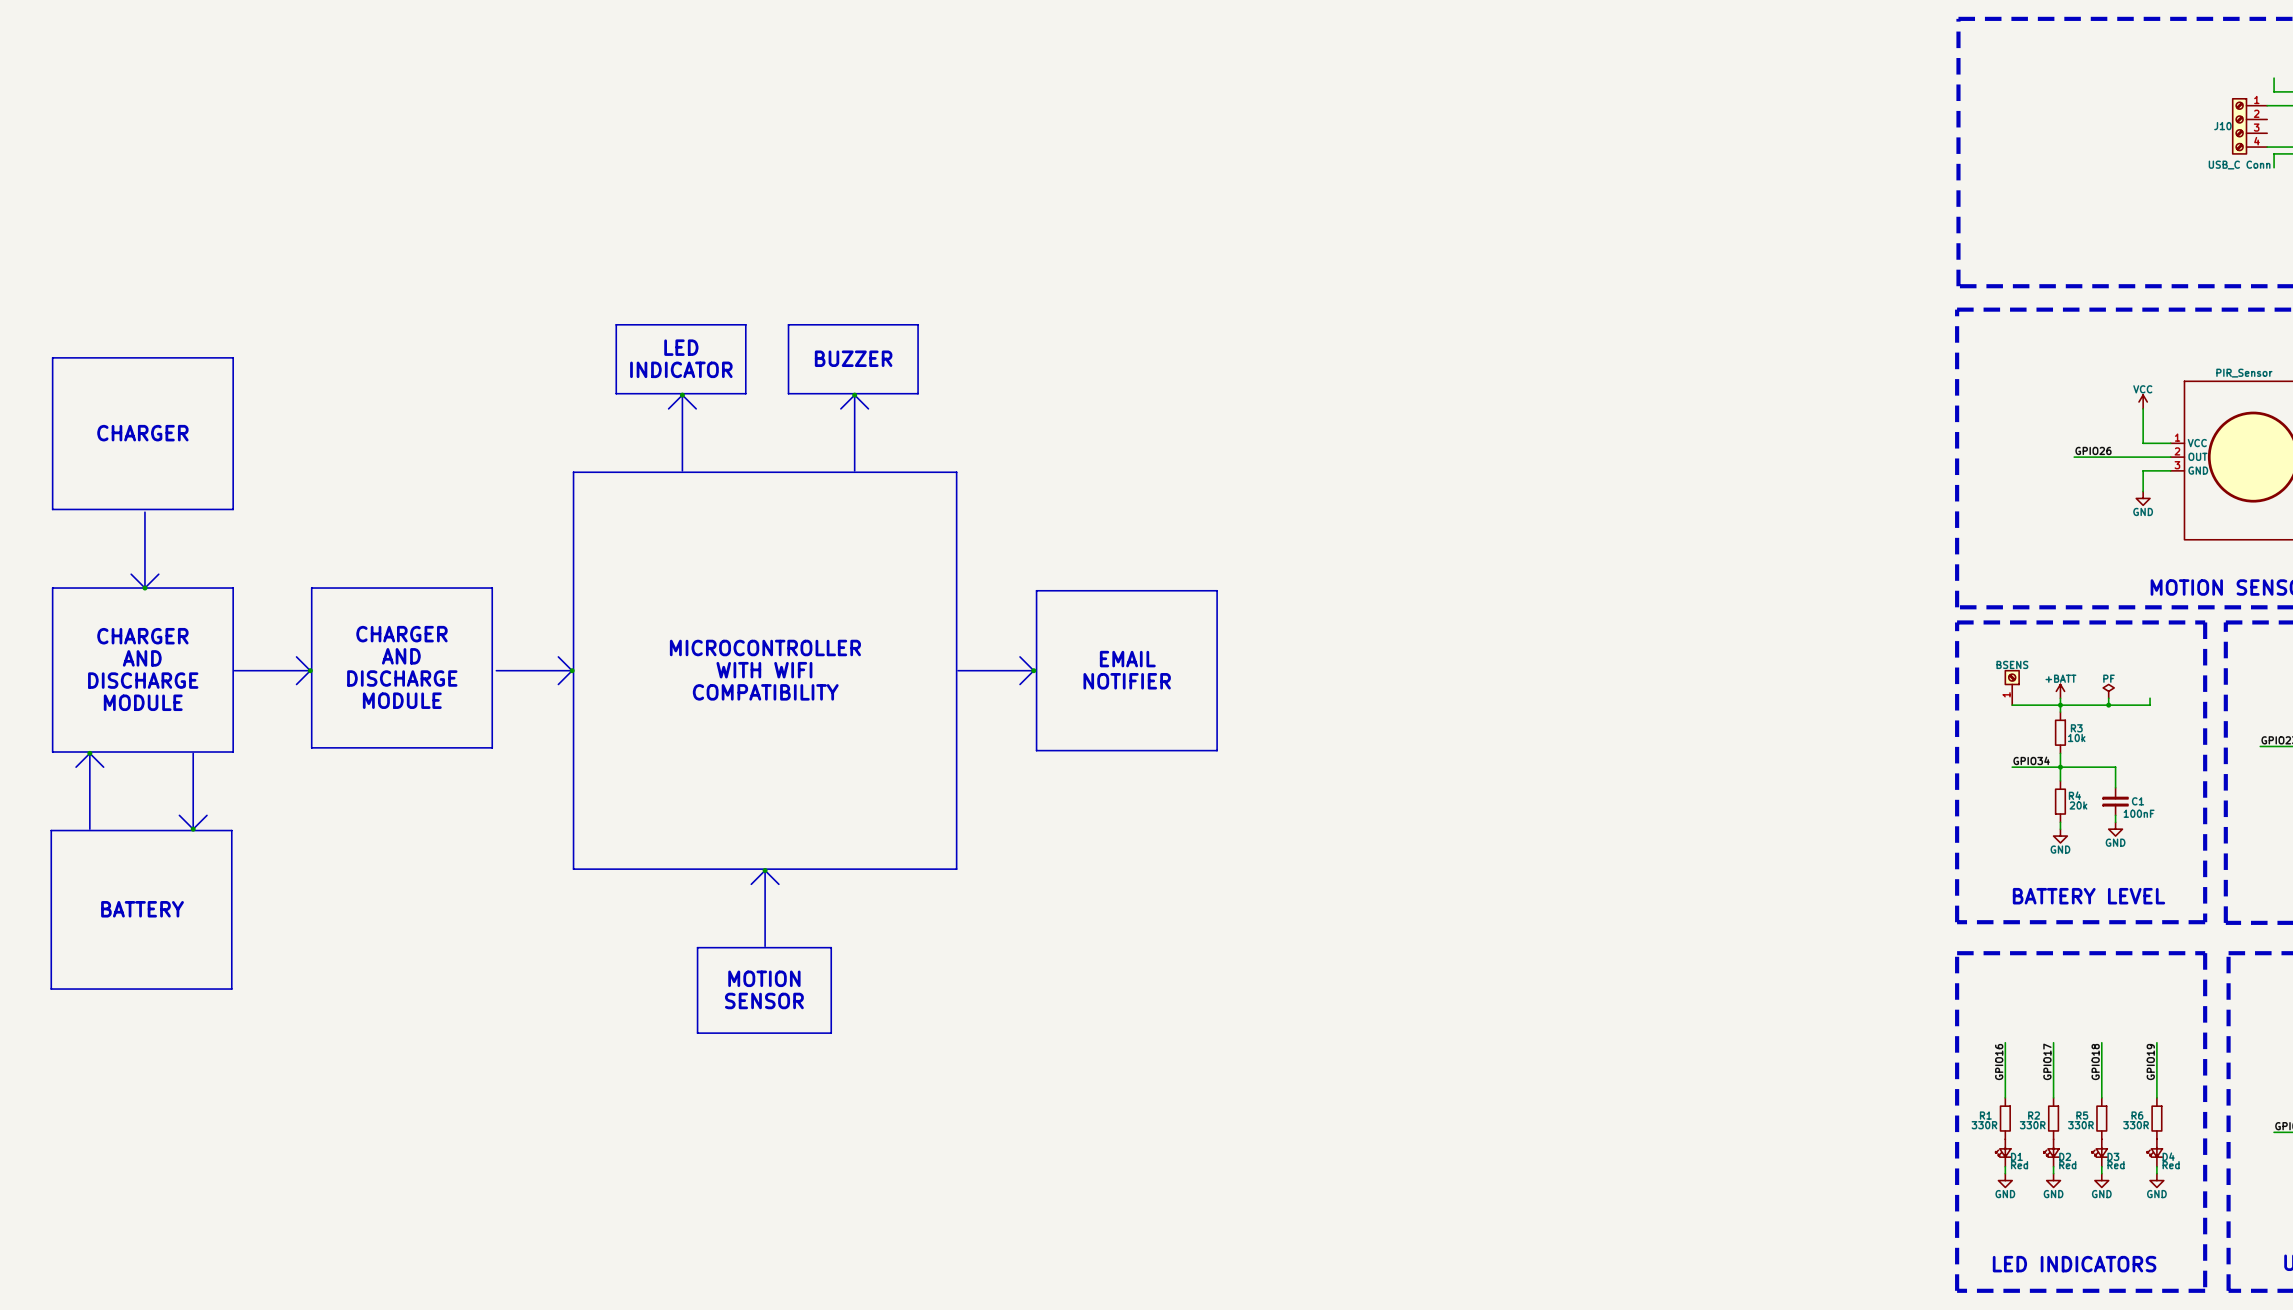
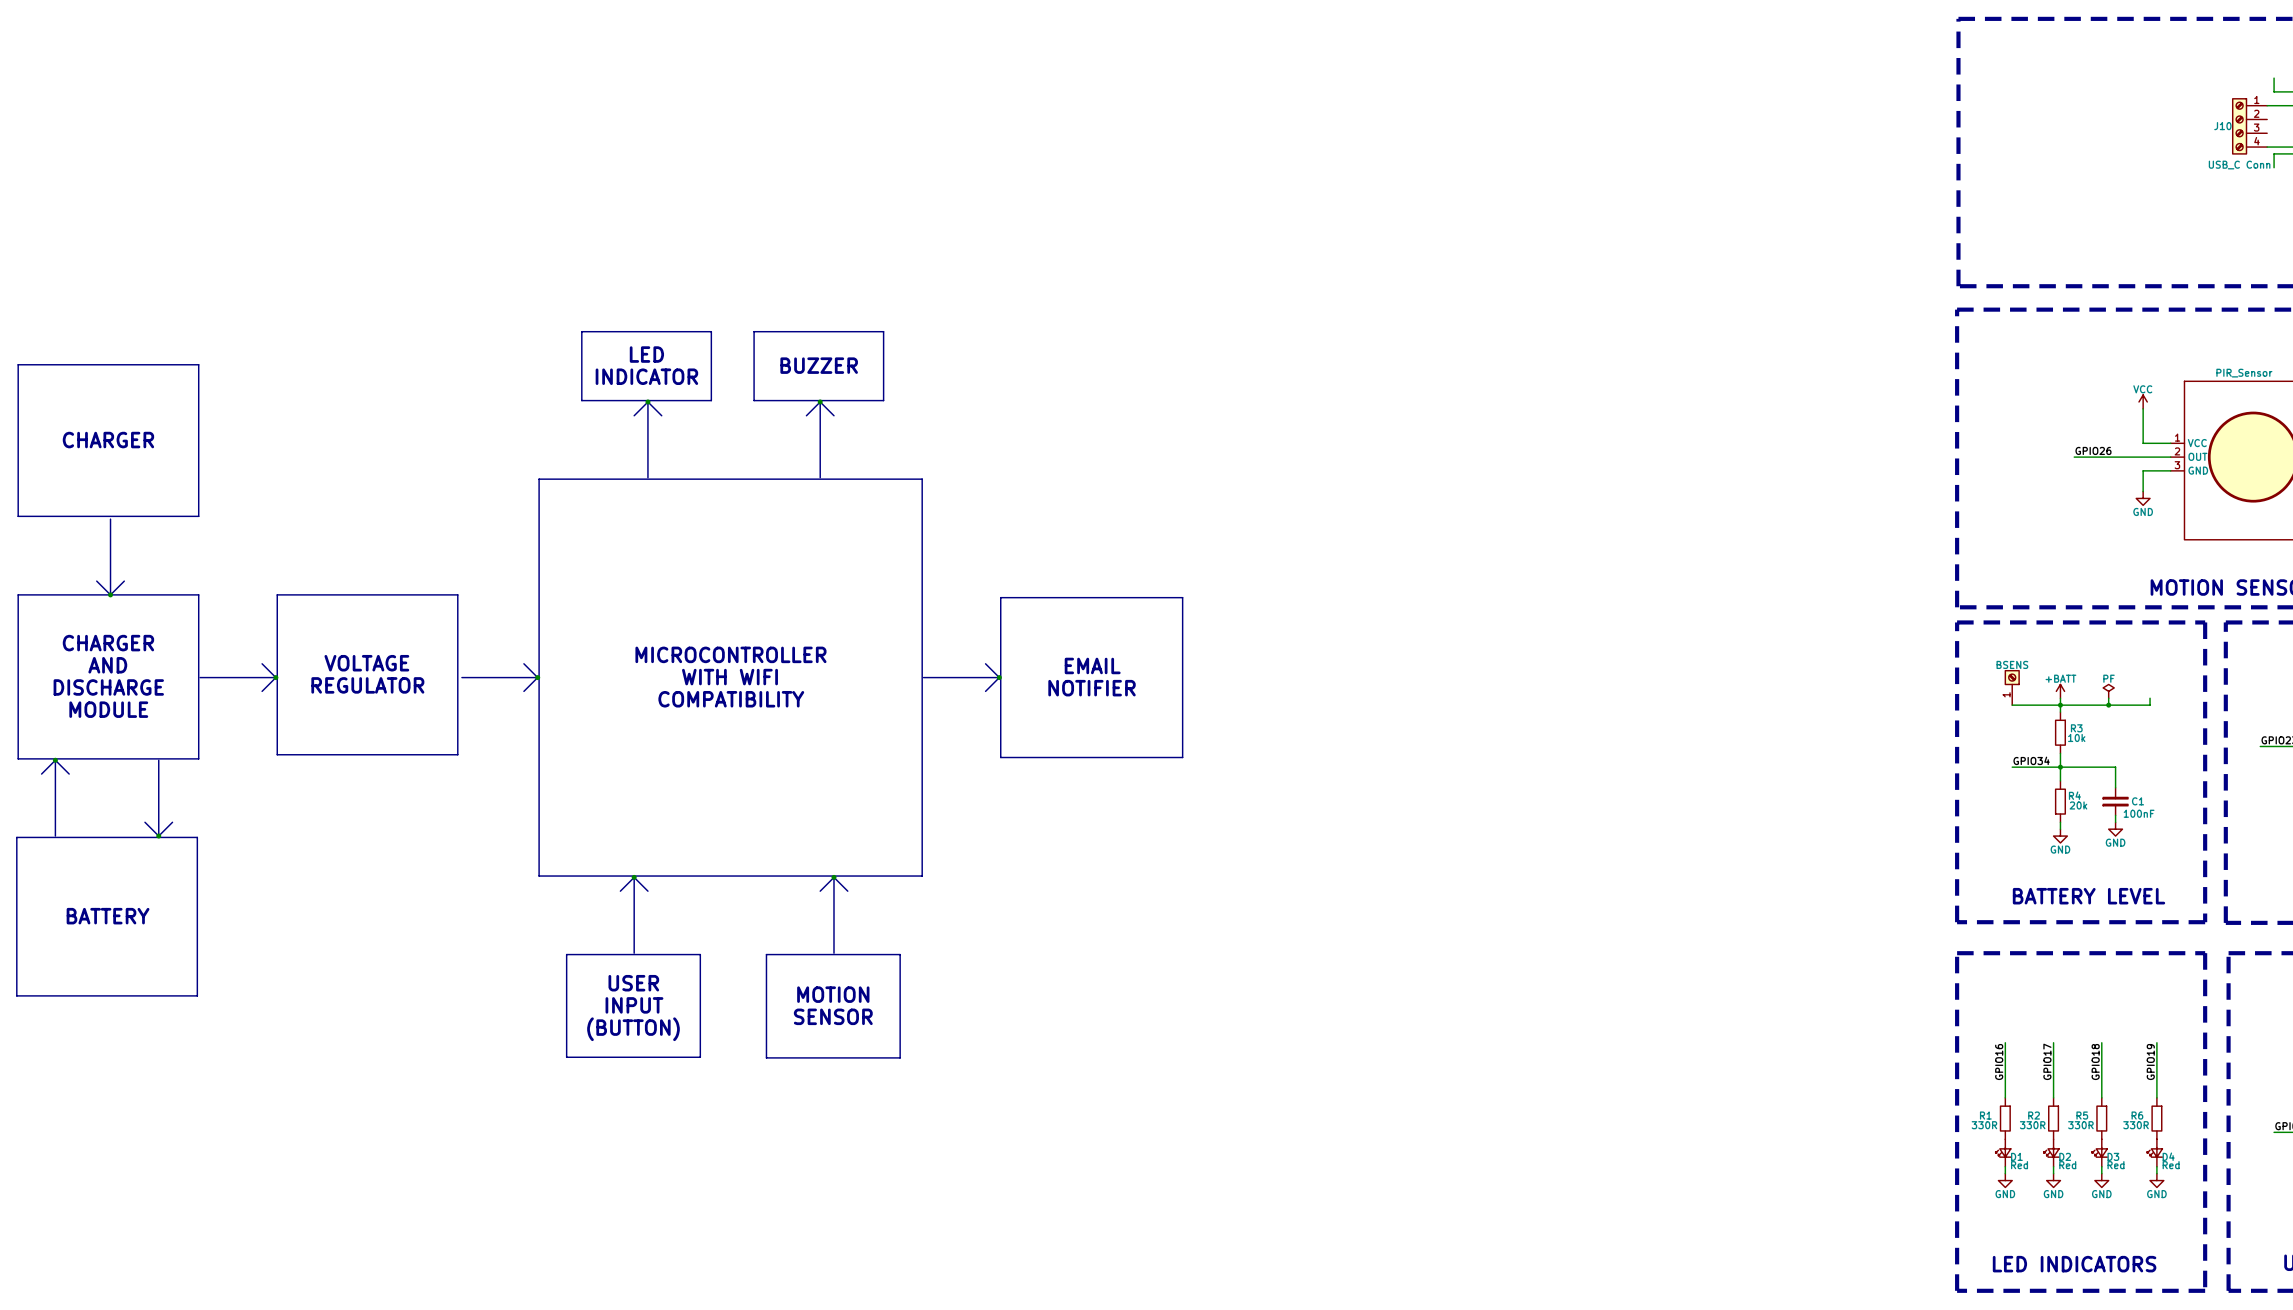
line: (616, 324) (745, 324) (745, 393) (616, 393) (616, 324) -> (581, 331) (711, 331) (711, 400) (581, 400) (581, 331)
line: (788, 324) (918, 324) (918, 393) (788, 393) (788, 324) -> (754, 331) (883, 331) (883, 400) (754, 400) (754, 331)
text position: LED (681, 347) -> LED (646, 354)
line: (52, 357) (233, 357) (233, 509) (52, 509) (52, 357) -> (18, 364) (198, 364) (198, 516) (18, 516) (18, 364)
text position: BUZZER (853, 358) -> BUZZER (819, 365)
text position: INDICATOR (681, 369) -> INDICATOR (646, 376)
bus: (682, 395) (696, 408) -> (647, 401) (661, 415)
bus: (682, 395) (668, 408) -> (647, 401) (634, 415)
bus: (682, 395) (682, 470) -> (647, 401) (647, 477)
junction: (682, 395) -> none
bus: (854, 395) (854, 470) -> (820, 401) (820, 477)
bus: (854, 395) (840, 408) -> (820, 401) (806, 415)
bus: (854, 395) (868, 408) -> (820, 401) (833, 415)
junction: (854, 395) -> none
junction: none -> (647, 401)
junction: none -> (820, 401)
text position: CHARGER (142, 433) -> CHARGER (108, 440)
line: (573, 472) (956, 472) (956, 869) (573, 869) (573, 472) -> (539, 479) (922, 479) (922, 876) (539, 876) (539, 479)
bus: (144, 512) (144, 588) -> (110, 519) (110, 594)
bus: (131, 574) (144, 588) -> (96, 581) (110, 594)
bus: (158, 574) (144, 588) -> (124, 581) (110, 594)
line: (52, 588) (52, 752) (233, 752) (233, 588) (52, 588) -> (18, 594) (18, 758) (198, 758) (198, 594) (18, 594)
junction: (144, 588) -> none
line: (311, 588) (492, 588) (492, 747) (311, 747) (311, 588) -> (277, 594) (457, 594) (457, 754) (277, 754) (277, 594)
line: (1036, 590) (1217, 590) (1217, 750) (1036, 750) (1036, 590) -> (1000, 597) (1000, 757) (1182, 757) (1182, 597) (1000, 597)
junction: none -> (110, 594)
text: CHARGER (401, 634) -> none
text position: CHARGER (142, 636) -> CHARGER (108, 643)
text position: MICROCONTROLLER (765, 647) -> MICROCONTROLLER (730, 654)
bus: (296, 656) (310, 670) -> (262, 663) (275, 677)
text: AND (401, 656) -> none
bus: (558, 656) (572, 670) -> (523, 663) (537, 677)
bus: (1020, 656) (1033, 670) -> (985, 663) (999, 677)
text position: AND (142, 658) -> AND (107, 665)
text position: EMAIL (1127, 659) -> EMAIL (1092, 665)
text: none -> VOLTAGE (366, 663)
bus: (234, 670) (310, 670) -> (200, 677) (275, 677)
bus: (310, 670) (296, 684) -> (275, 677) (262, 691)
junction: (310, 670) -> none
bus: (496, 670) (572, 670) -> (461, 677) (537, 677)
bus: (572, 670) (558, 684) -> (537, 677) (523, 691)
junction: (572, 670) -> none
text position: WITH WIFI (764, 670) -> WITH WIFI (729, 677)
bus: (958, 670) (1033, 670) -> (923, 677) (999, 677)
bus: (1033, 670) (1020, 684) -> (999, 677) (985, 691)
junction: (1033, 670) -> none
junction: none -> (275, 677)
junction: none -> (537, 677)
junction: none -> (999, 677)
text: DISCHARGE (402, 678) -> none
text position: DISCHARGE (143, 680) -> DISCHARGE (108, 687)
text position: NOTIFIER (1127, 681) -> NOTIFIER (1092, 688)
text: none -> REGULATOR (367, 685)
text position: COMPATIBILITY (765, 692) -> COMPATIBILITY (731, 699)
text: MODULE (402, 700) -> none
text position: MODULE (143, 702) -> MODULE (108, 709)
bus: (89, 753) (76, 767) -> (55, 760) (41, 774)
bus: (89, 753) (103, 767) -> (55, 760) (69, 774)
bus: (89, 753) (89, 829) -> (55, 760) (55, 836)
junction: (89, 753) -> none
bus: (193, 753) (193, 829) -> (158, 760) (158, 836)
junction: none -> (55, 760)
bus: (179, 815) (193, 829) -> (144, 822) (158, 836)
bus: (206, 815) (193, 829) -> (172, 822) (158, 836)
junction: (193, 829) -> none
line: (51, 830) (231, 830) (231, 989) (51, 989) (51, 830) -> (16, 837) (197, 837) (197, 995) (16, 995) (16, 837)
junction: none -> (158, 836)
bus: (765, 870) (765, 946) -> (833, 877) (833, 953)
bus: (765, 870) (751, 884) -> (833, 877) (820, 891)
bus: (765, 870) (778, 884) -> (833, 877) (847, 891)
junction: (765, 870) -> none
bus: none -> (634, 877) (620, 891)
bus: none -> (634, 877) (647, 891)
bus: none -> (634, 877) (634, 953)
junction: none -> (634, 877)
junction: none -> (833, 877)
text position: BATTERY (142, 909) -> BATTERY (108, 916)
line: (697, 947) (831, 947) (831, 1033) (697, 1033) (697, 947) -> none
line: none -> (566, 954) (700, 954) (700, 1057) (566, 1057) (566, 954)
line: none -> (766, 954) (900, 954) (900, 1057) (766, 1057) (766, 954)
text position: MOTION (764, 978) -> MOTION (833, 994)
text: none -> USER (633, 983)
text position: SENSOR (764, 1000) -> SENSOR (833, 1016)
text: none -> INPUT (634, 1005)
text: none -> (BUTTON) (633, 1029)

